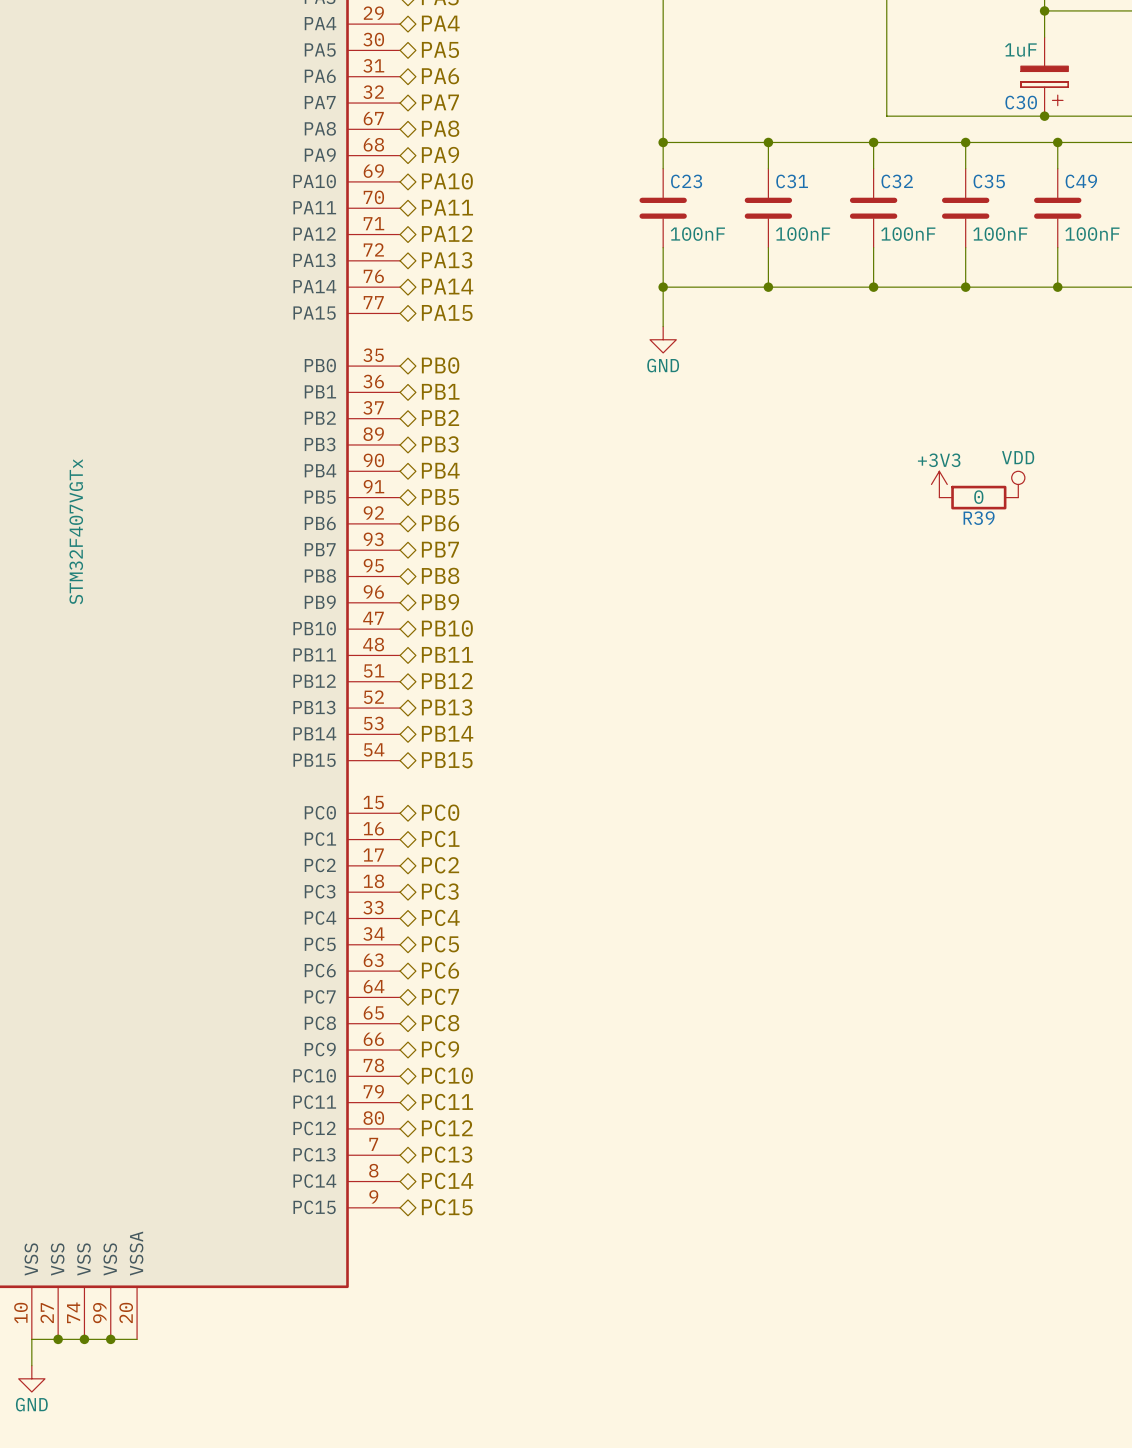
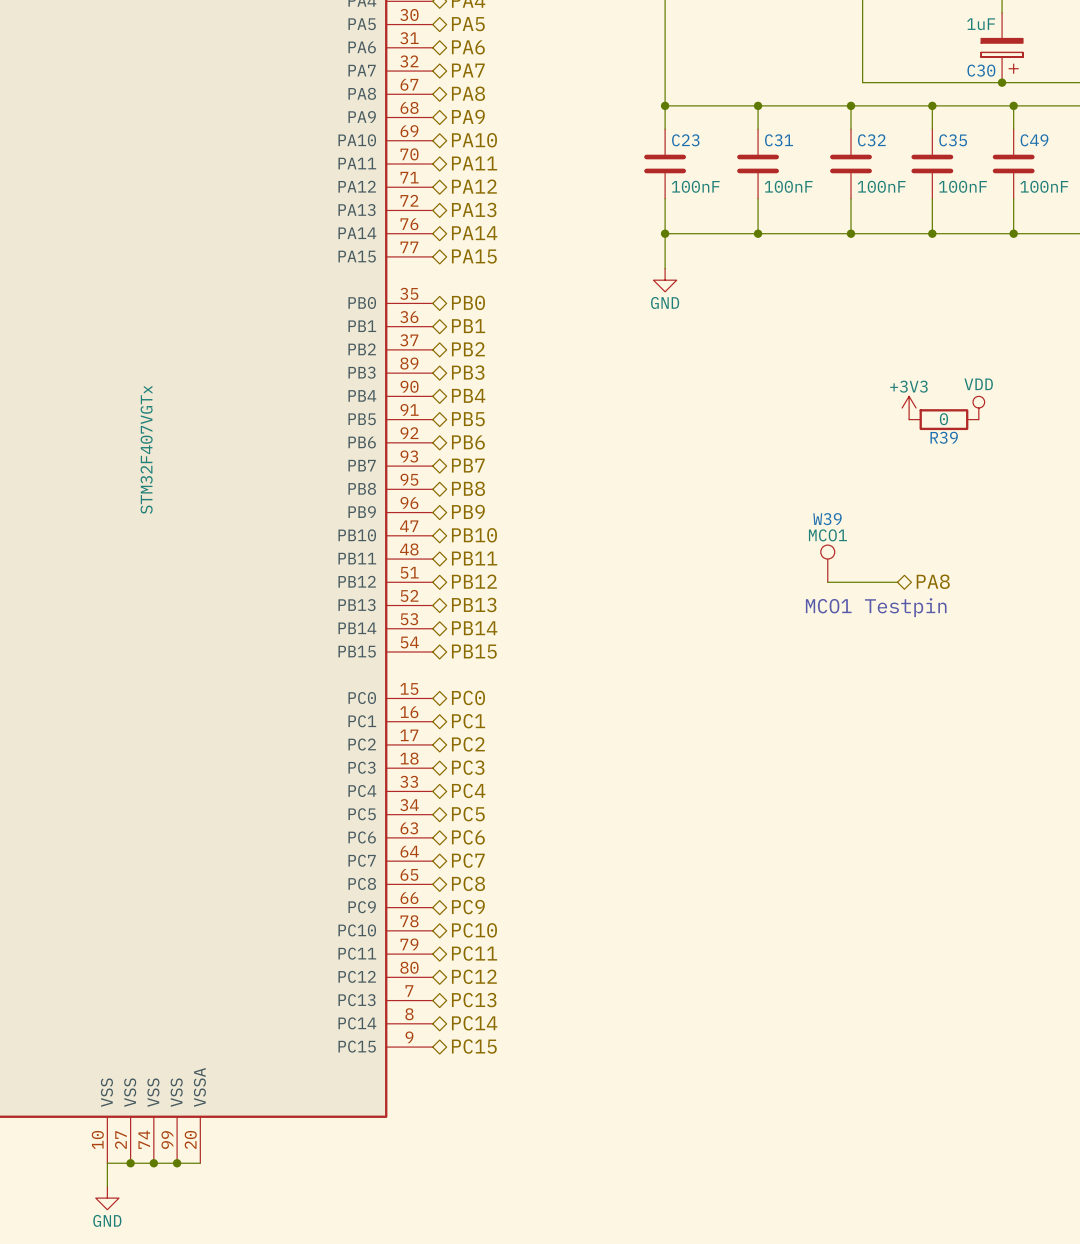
W39: none -> MCO1 (827, 563)
wire: none -> (827, 582) (897, 582)
hierarchical label: none -> PA8 (933, 581)
text: none -> MCO1 Testpin (876, 607)

